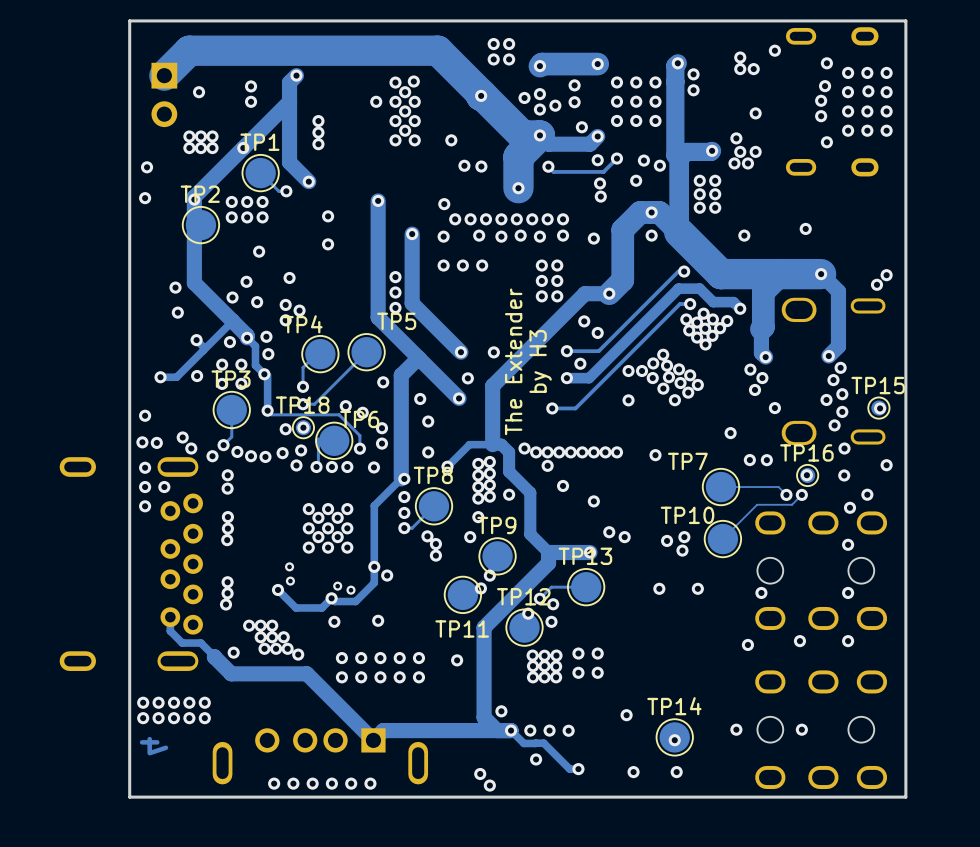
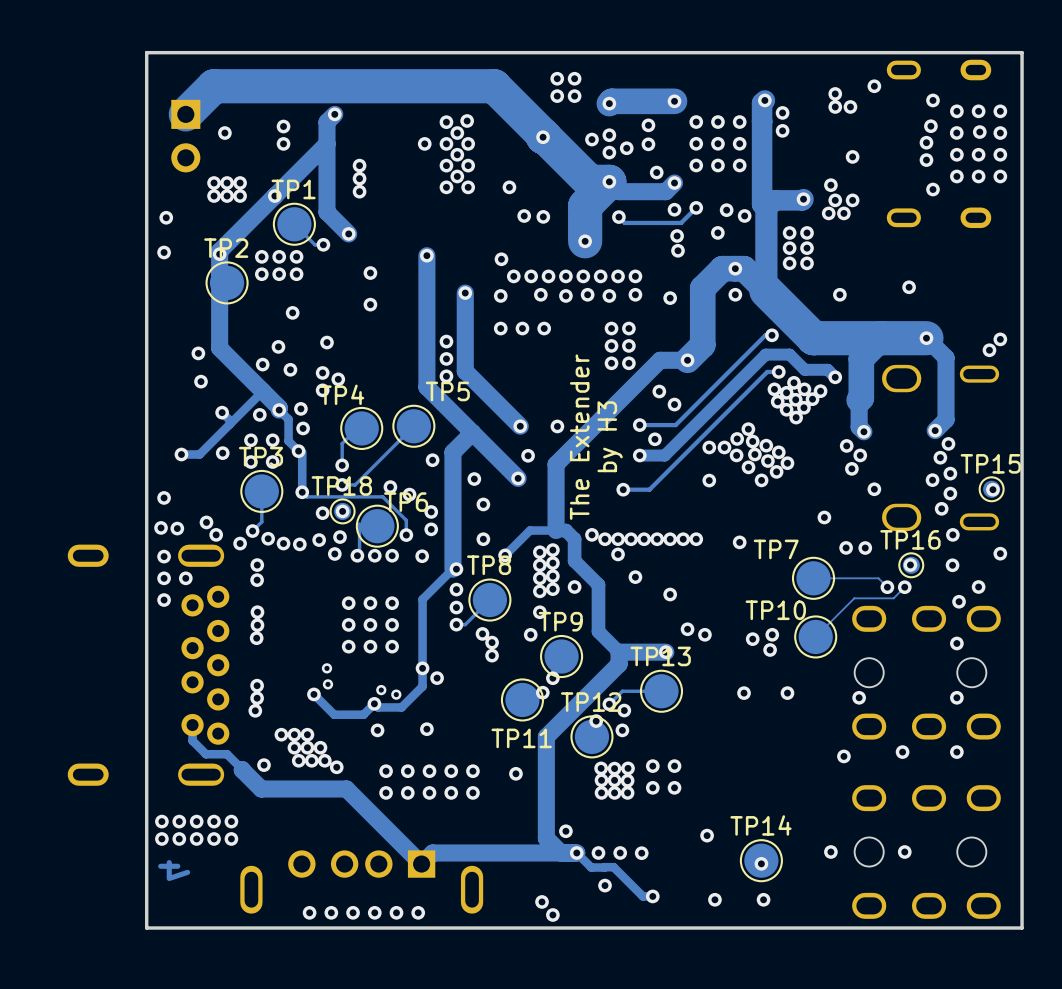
via: (318, 517) -> none
via: (337, 517) -> none
via: (318, 537) -> none
via: (337, 537) -> none

